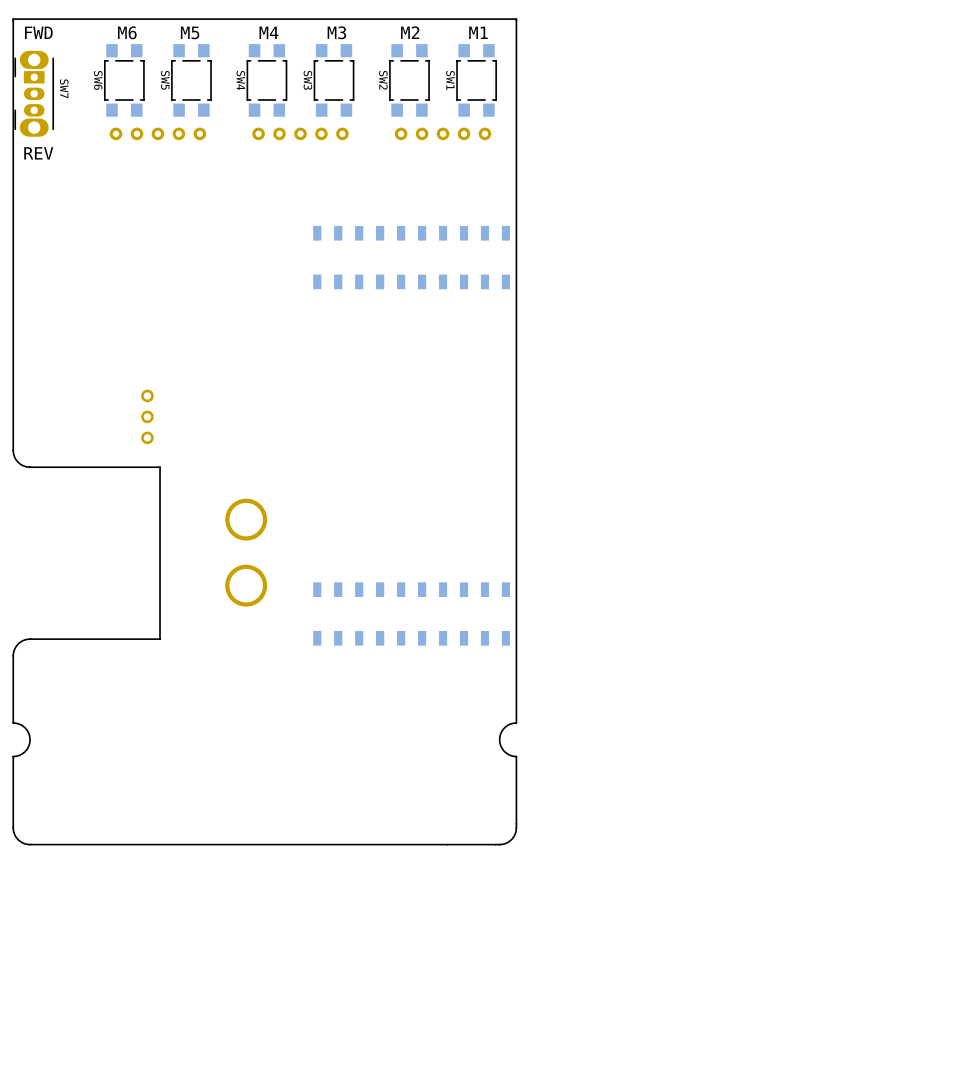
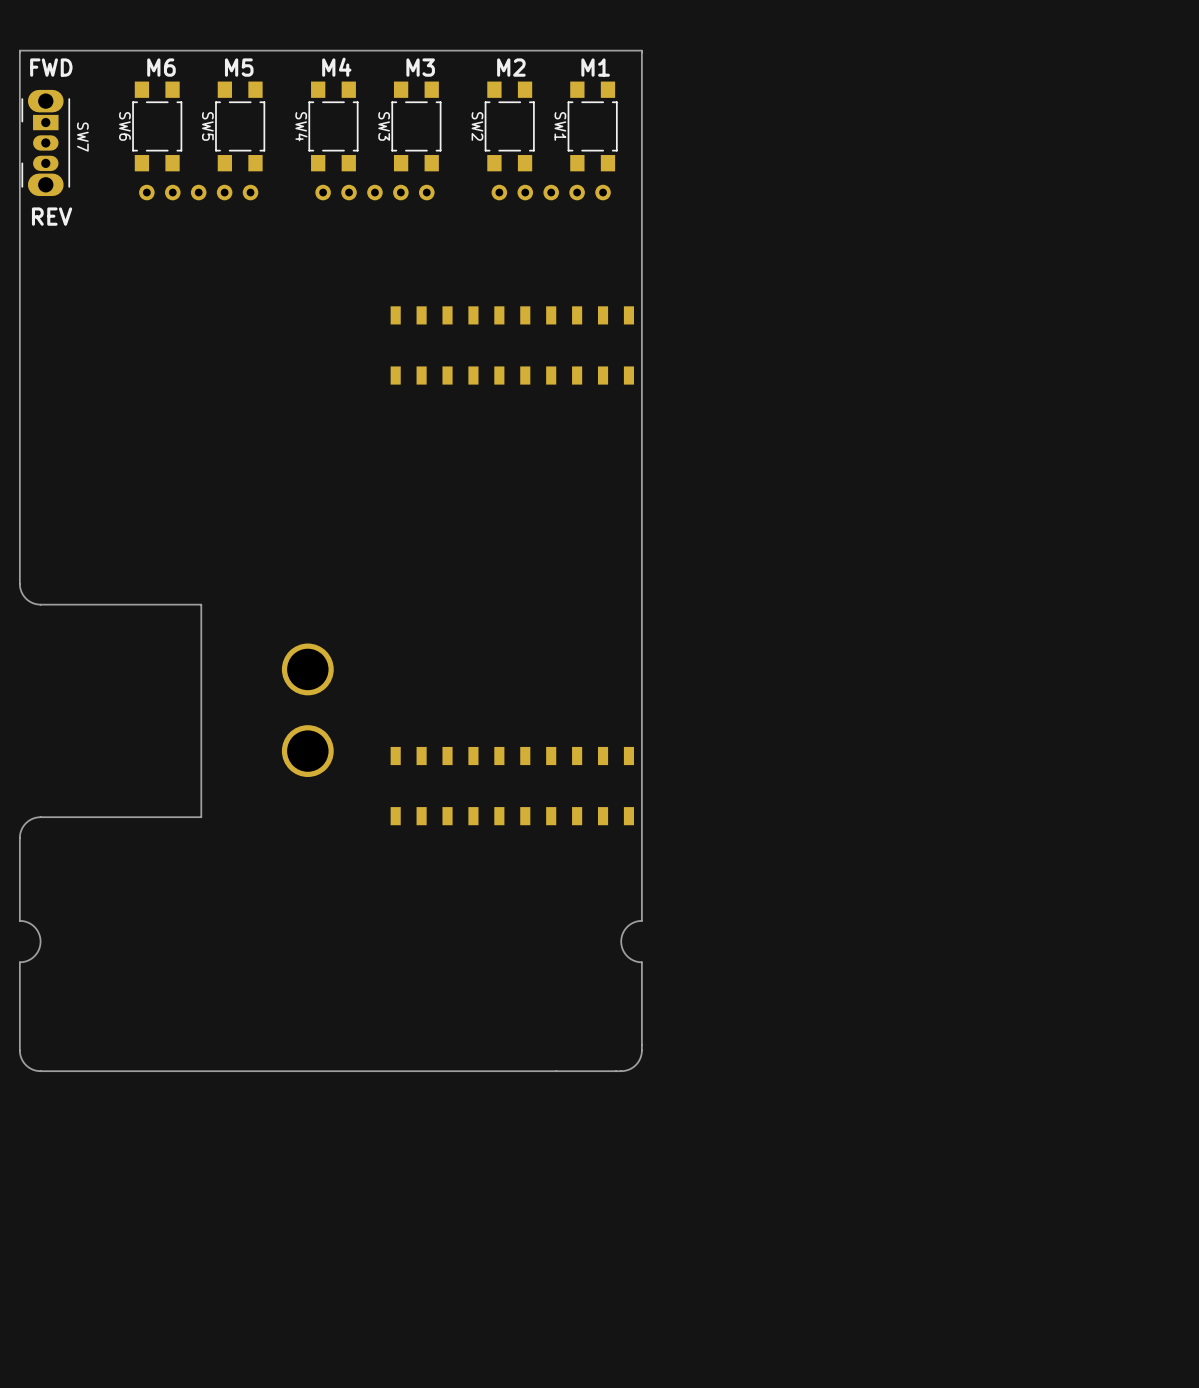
part: (147, 416) -> none

